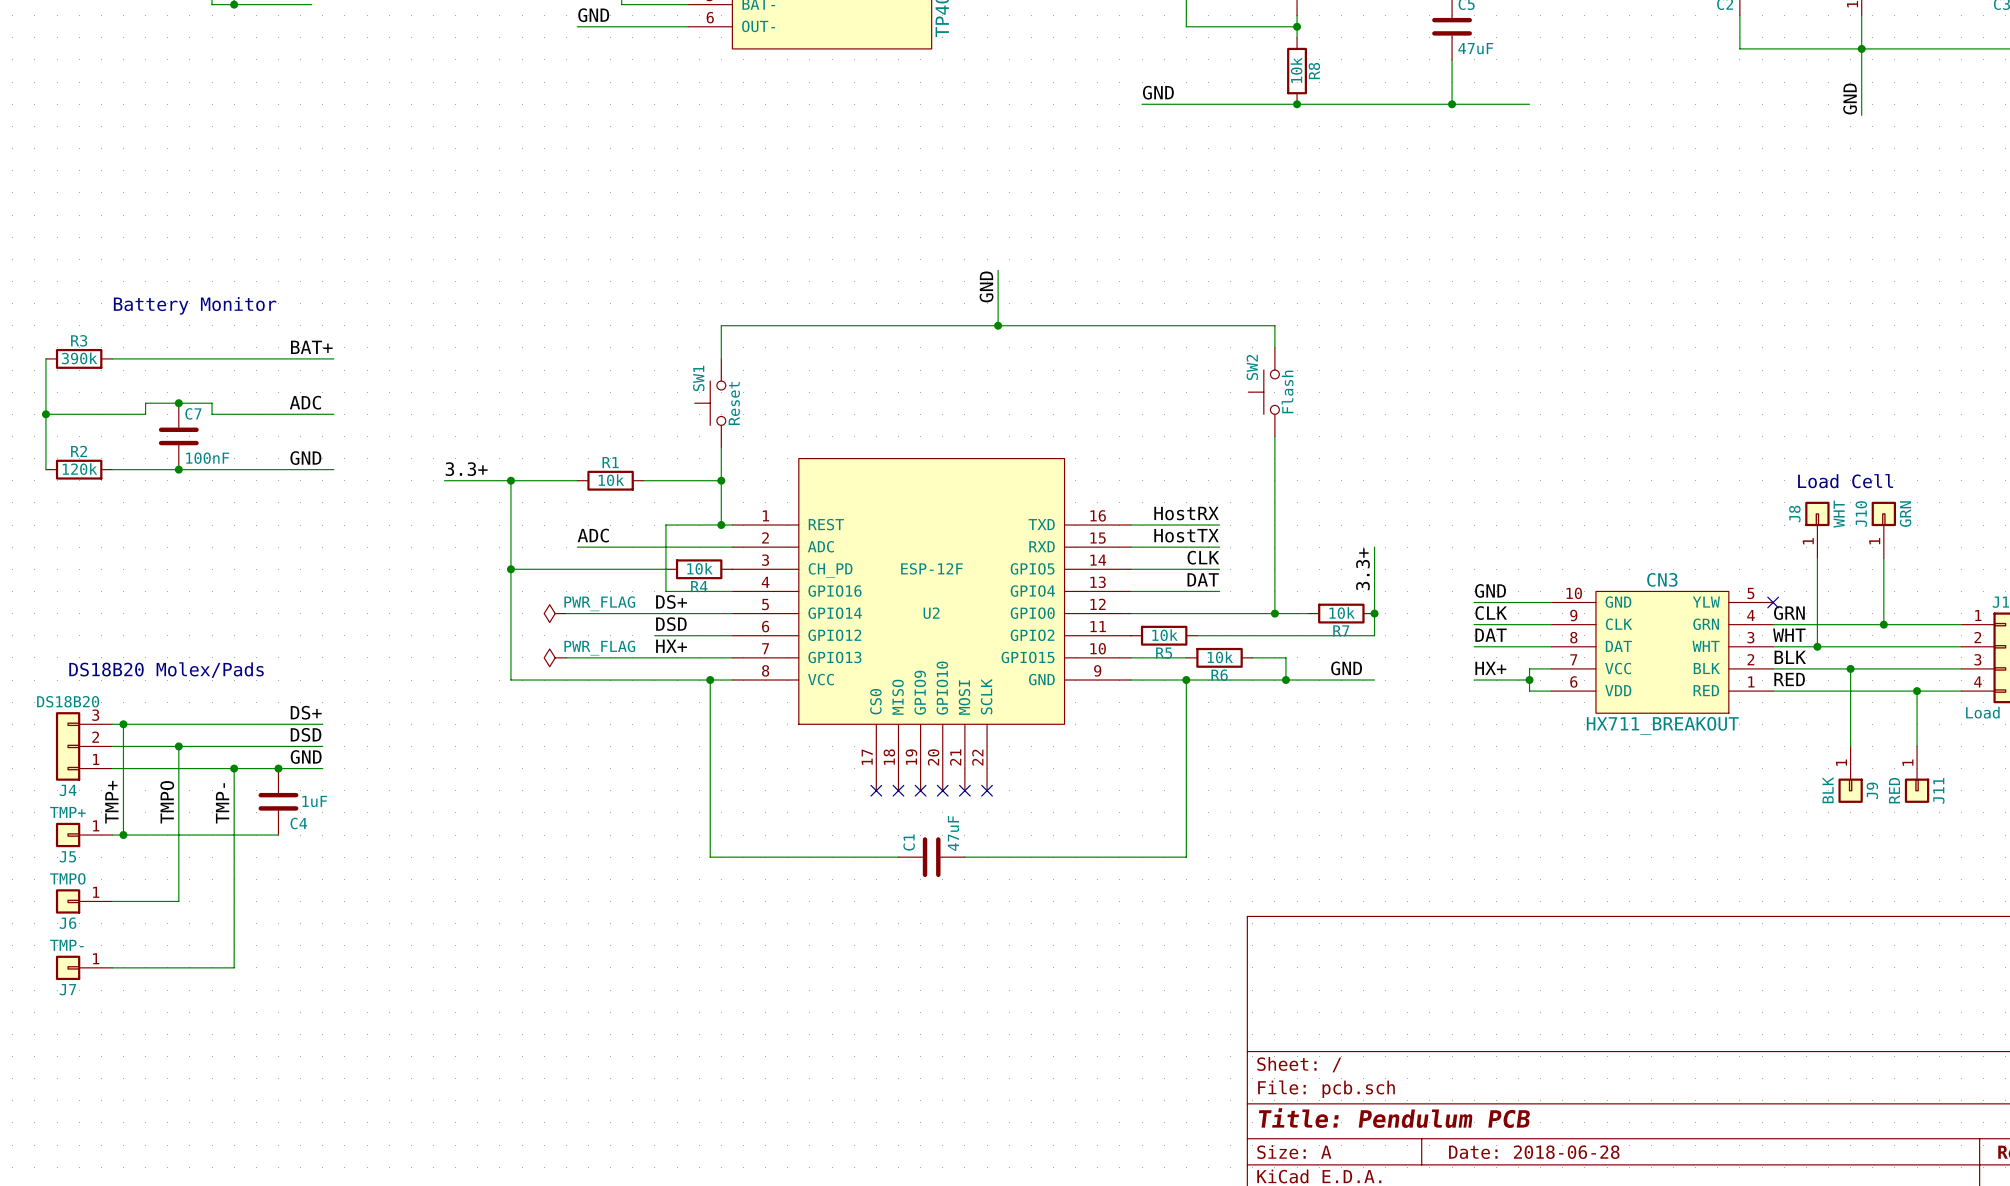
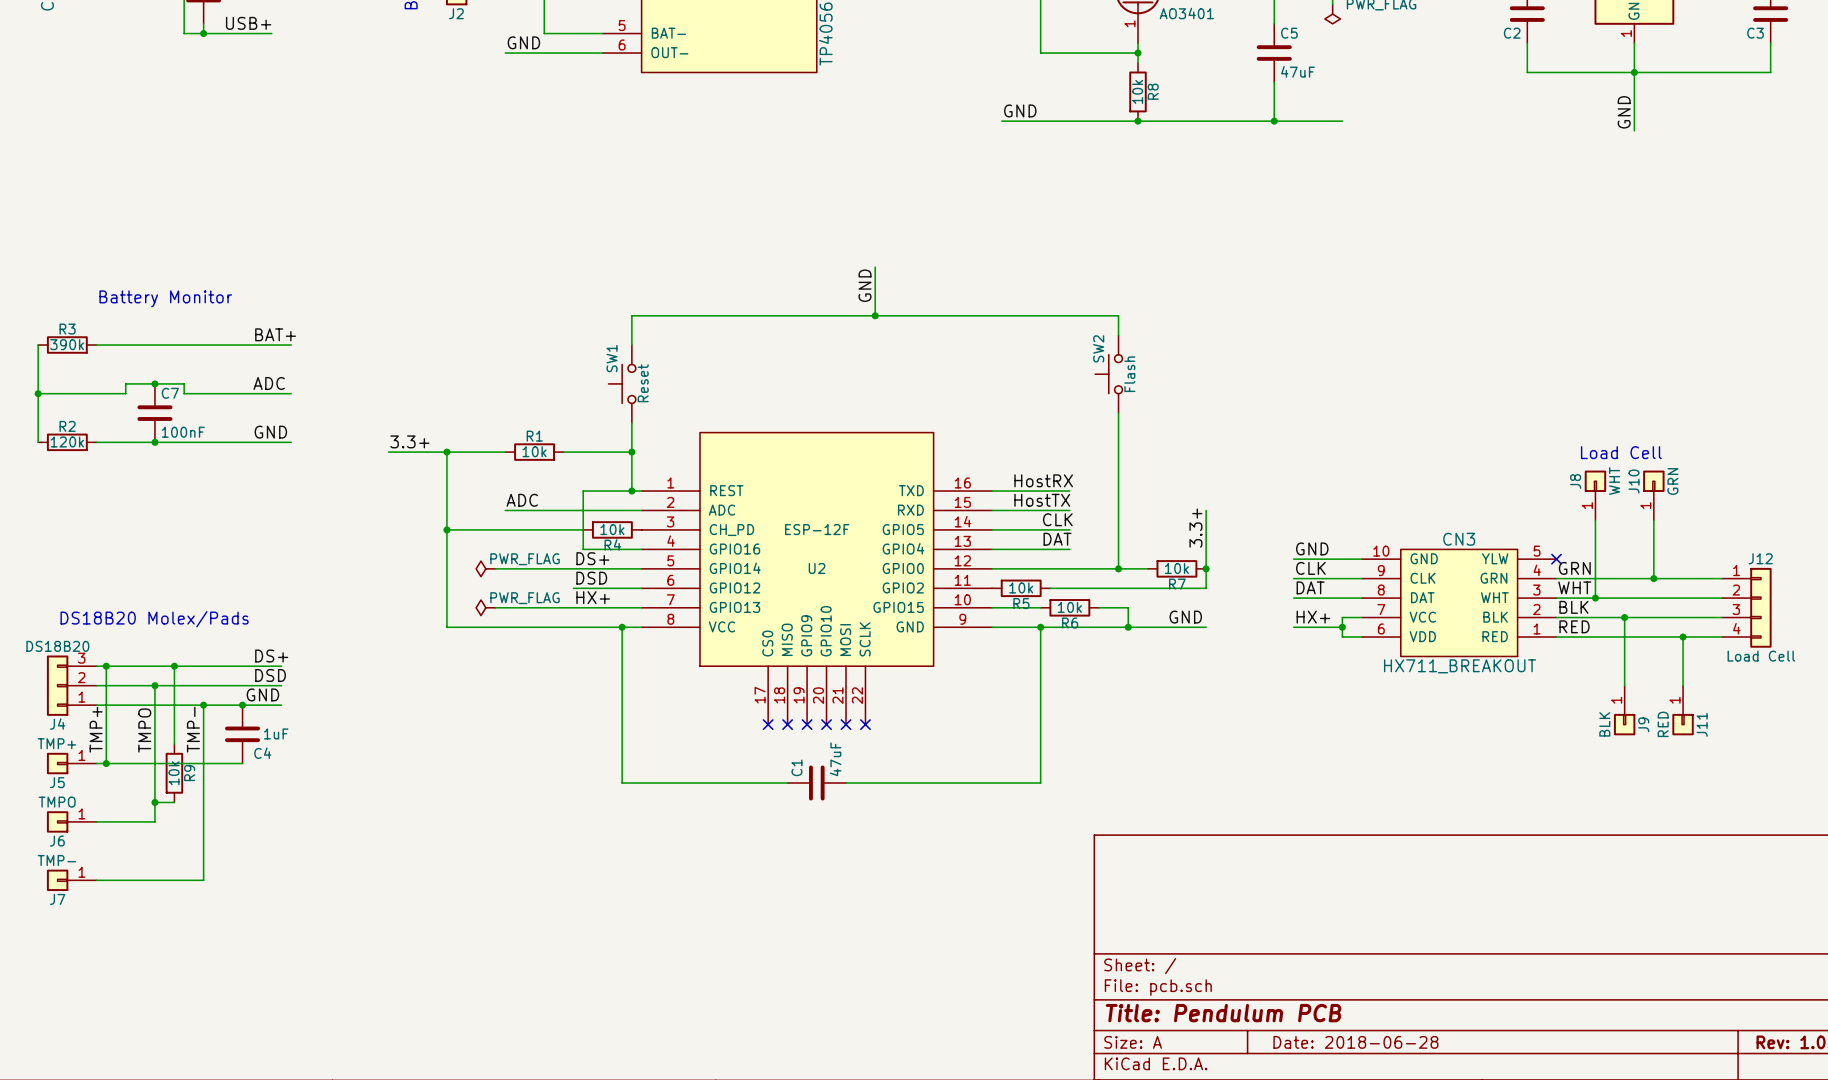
wire: none -> (174, 666) (174, 744)
junction: none -> (174, 666)
R9: none -> 10k (174, 773)
wire: none -> (154, 802) (174, 802)
junction: none -> (154, 802)

